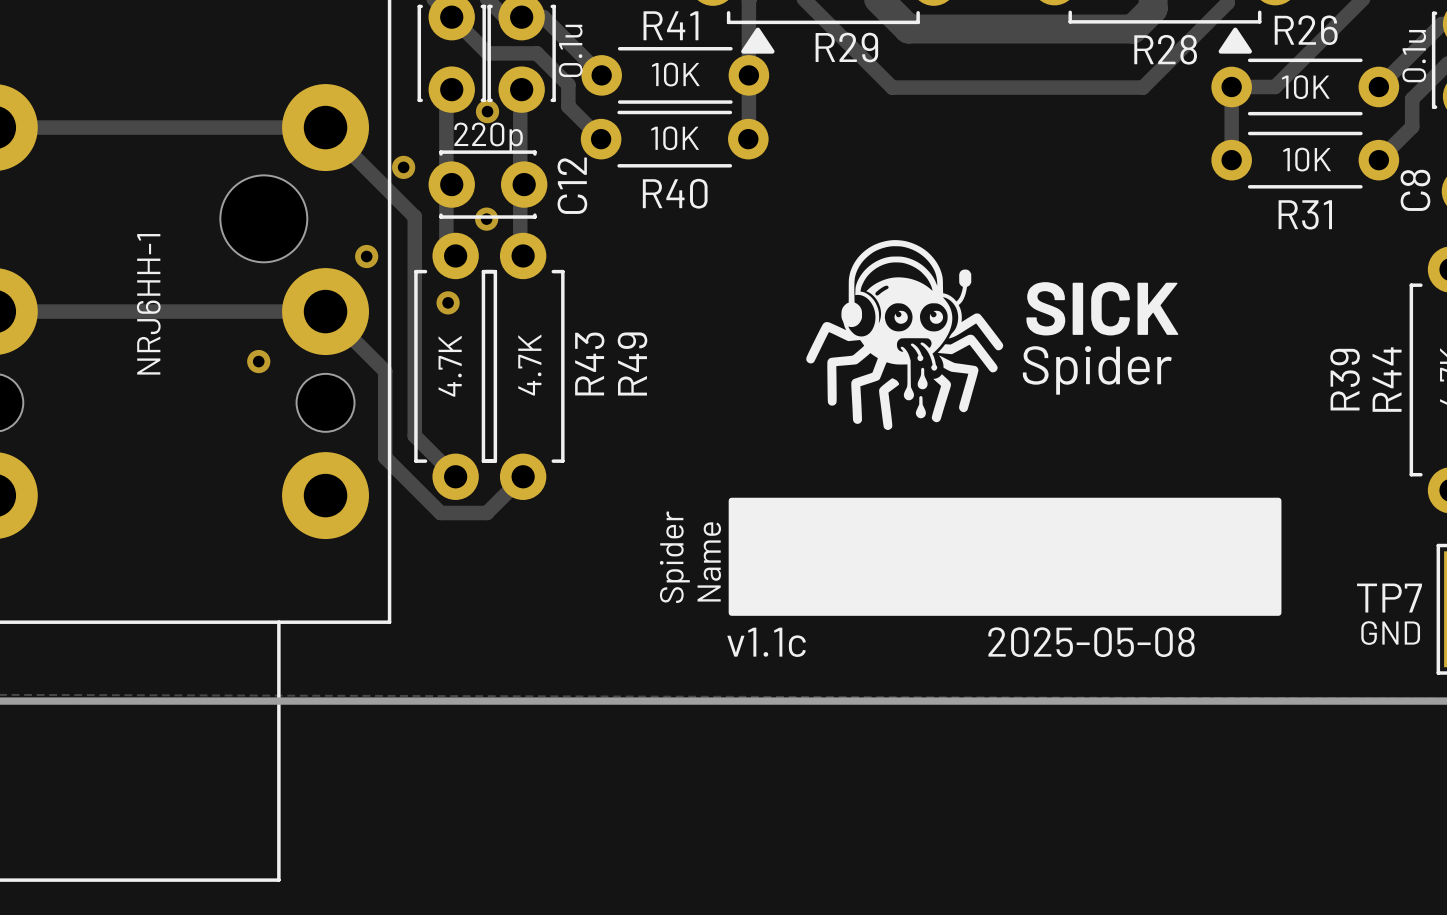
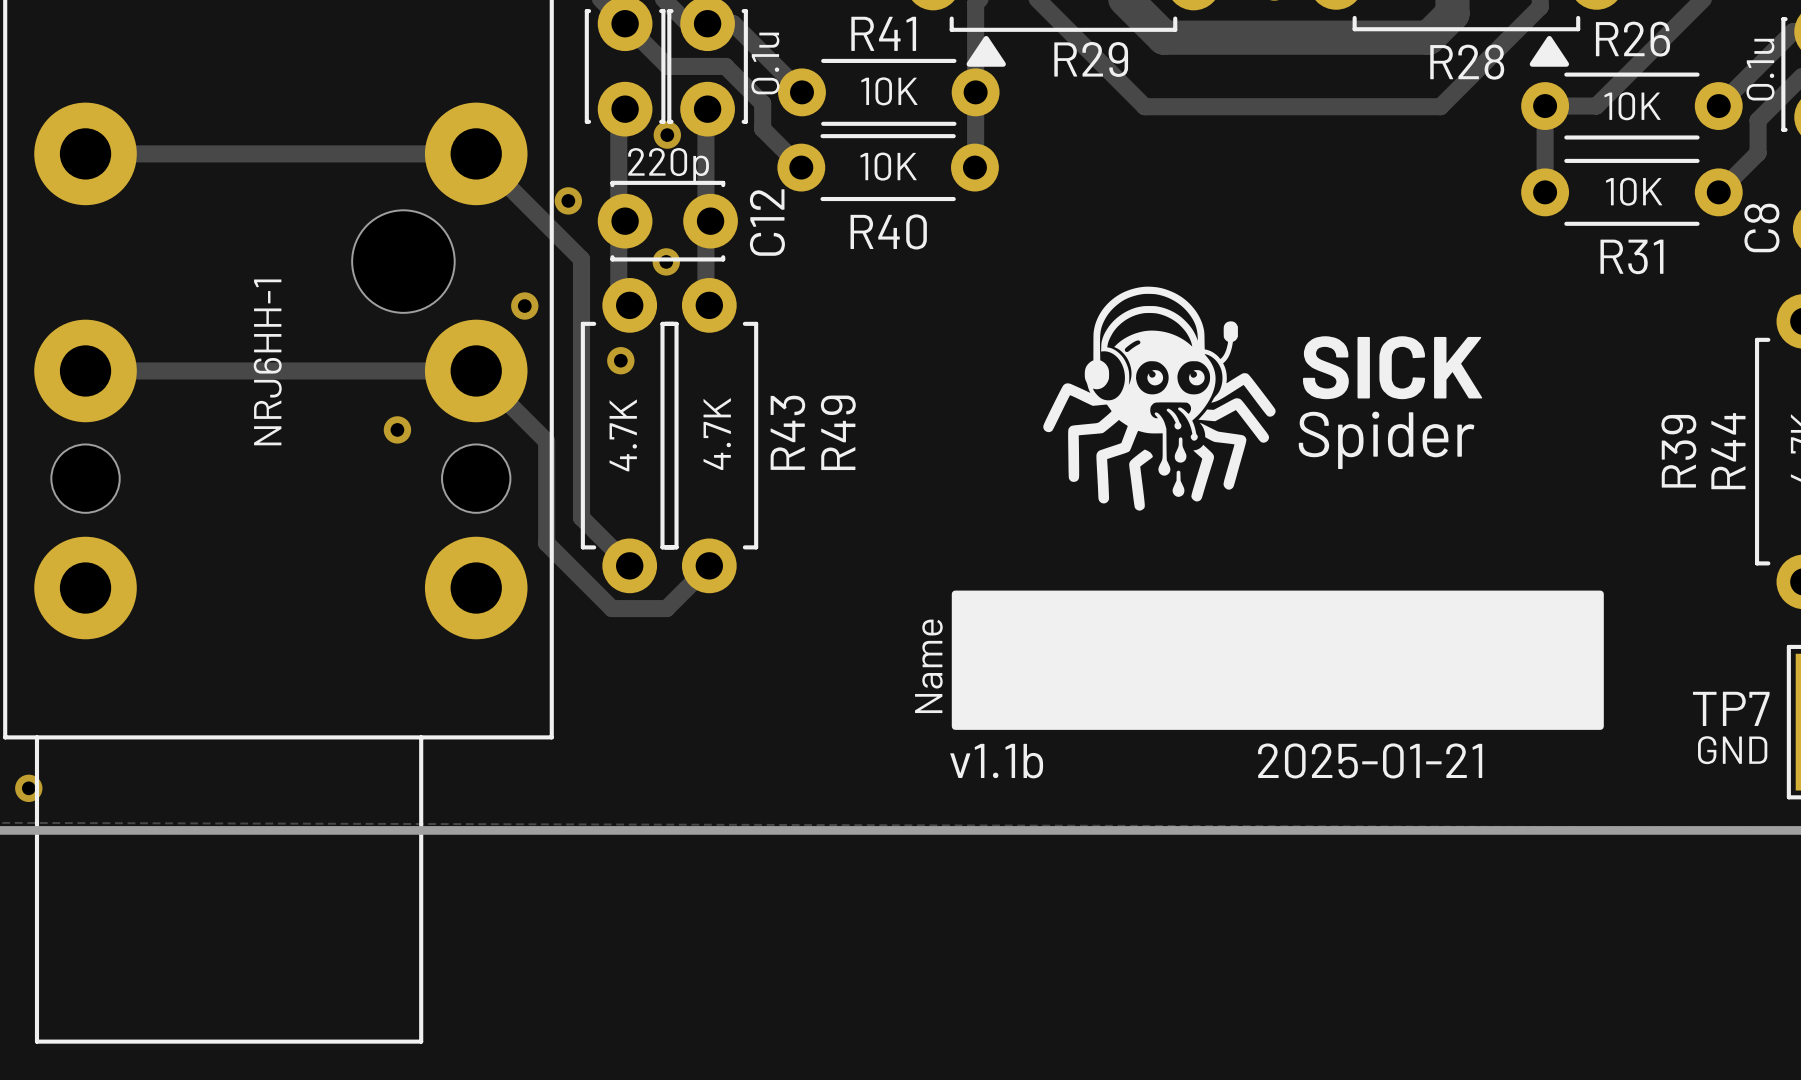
text: Spider (674, 557) -> none
text: v1.1c (766, 642) -> v1.1b (996, 761)
text: 2025-05-08 (1091, 642) -> 2025-01-21 (1370, 760)

